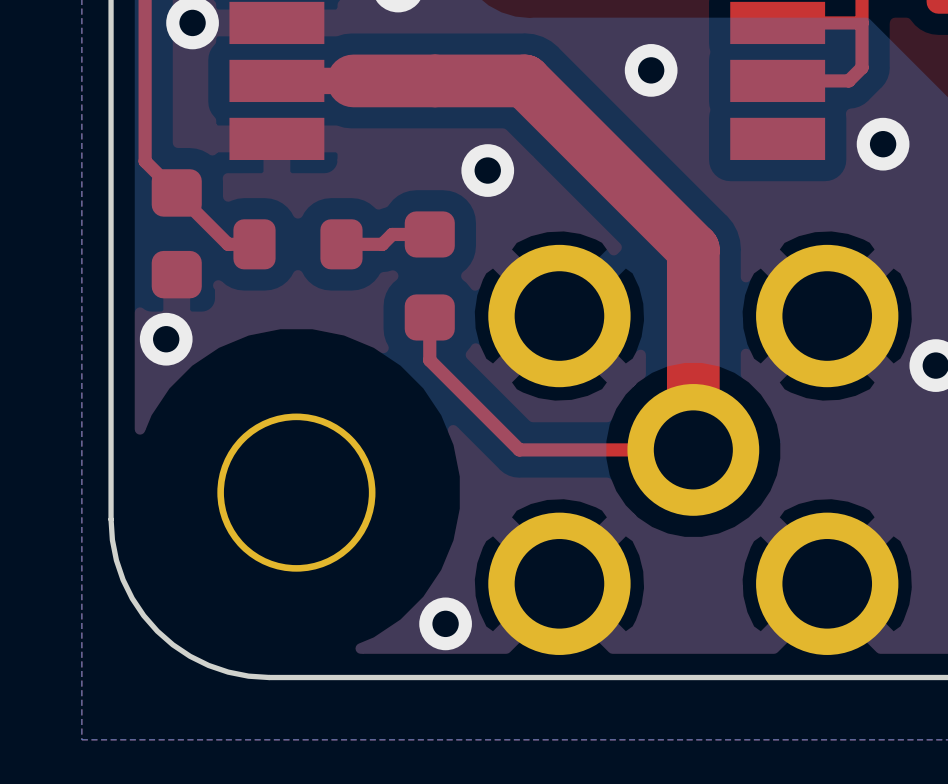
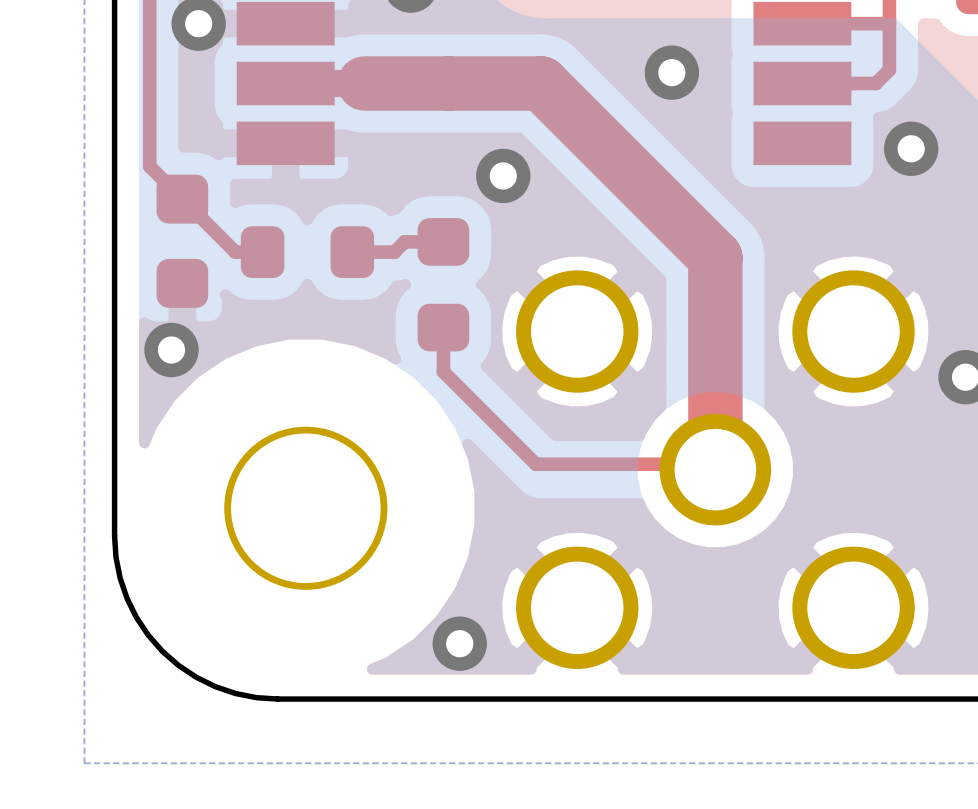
part footprint: [488, 244, 899, 655] -> [516, 270, 915, 670]

